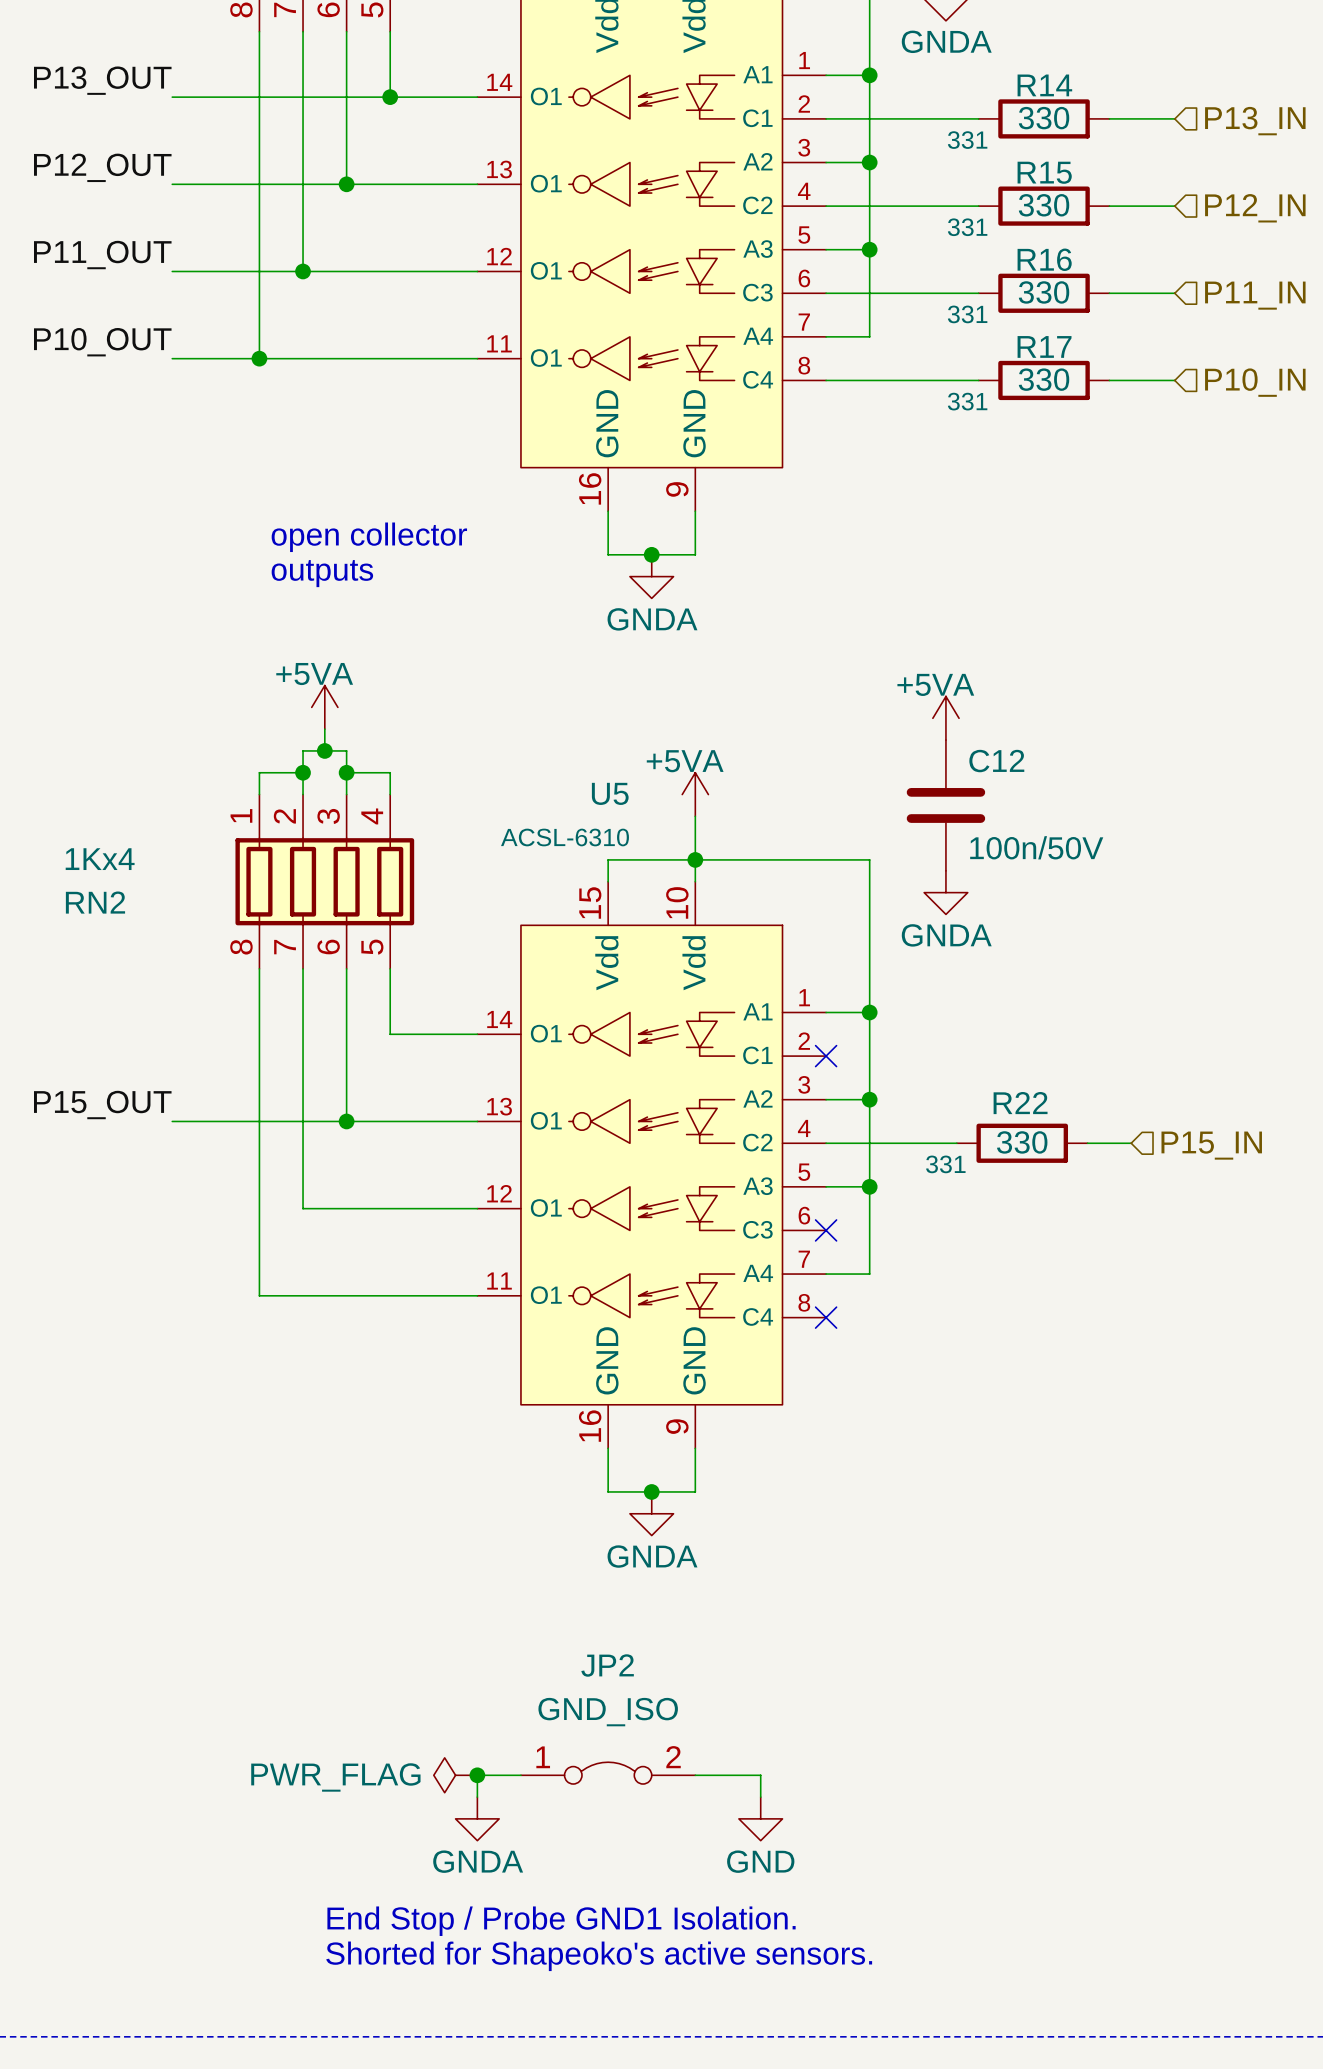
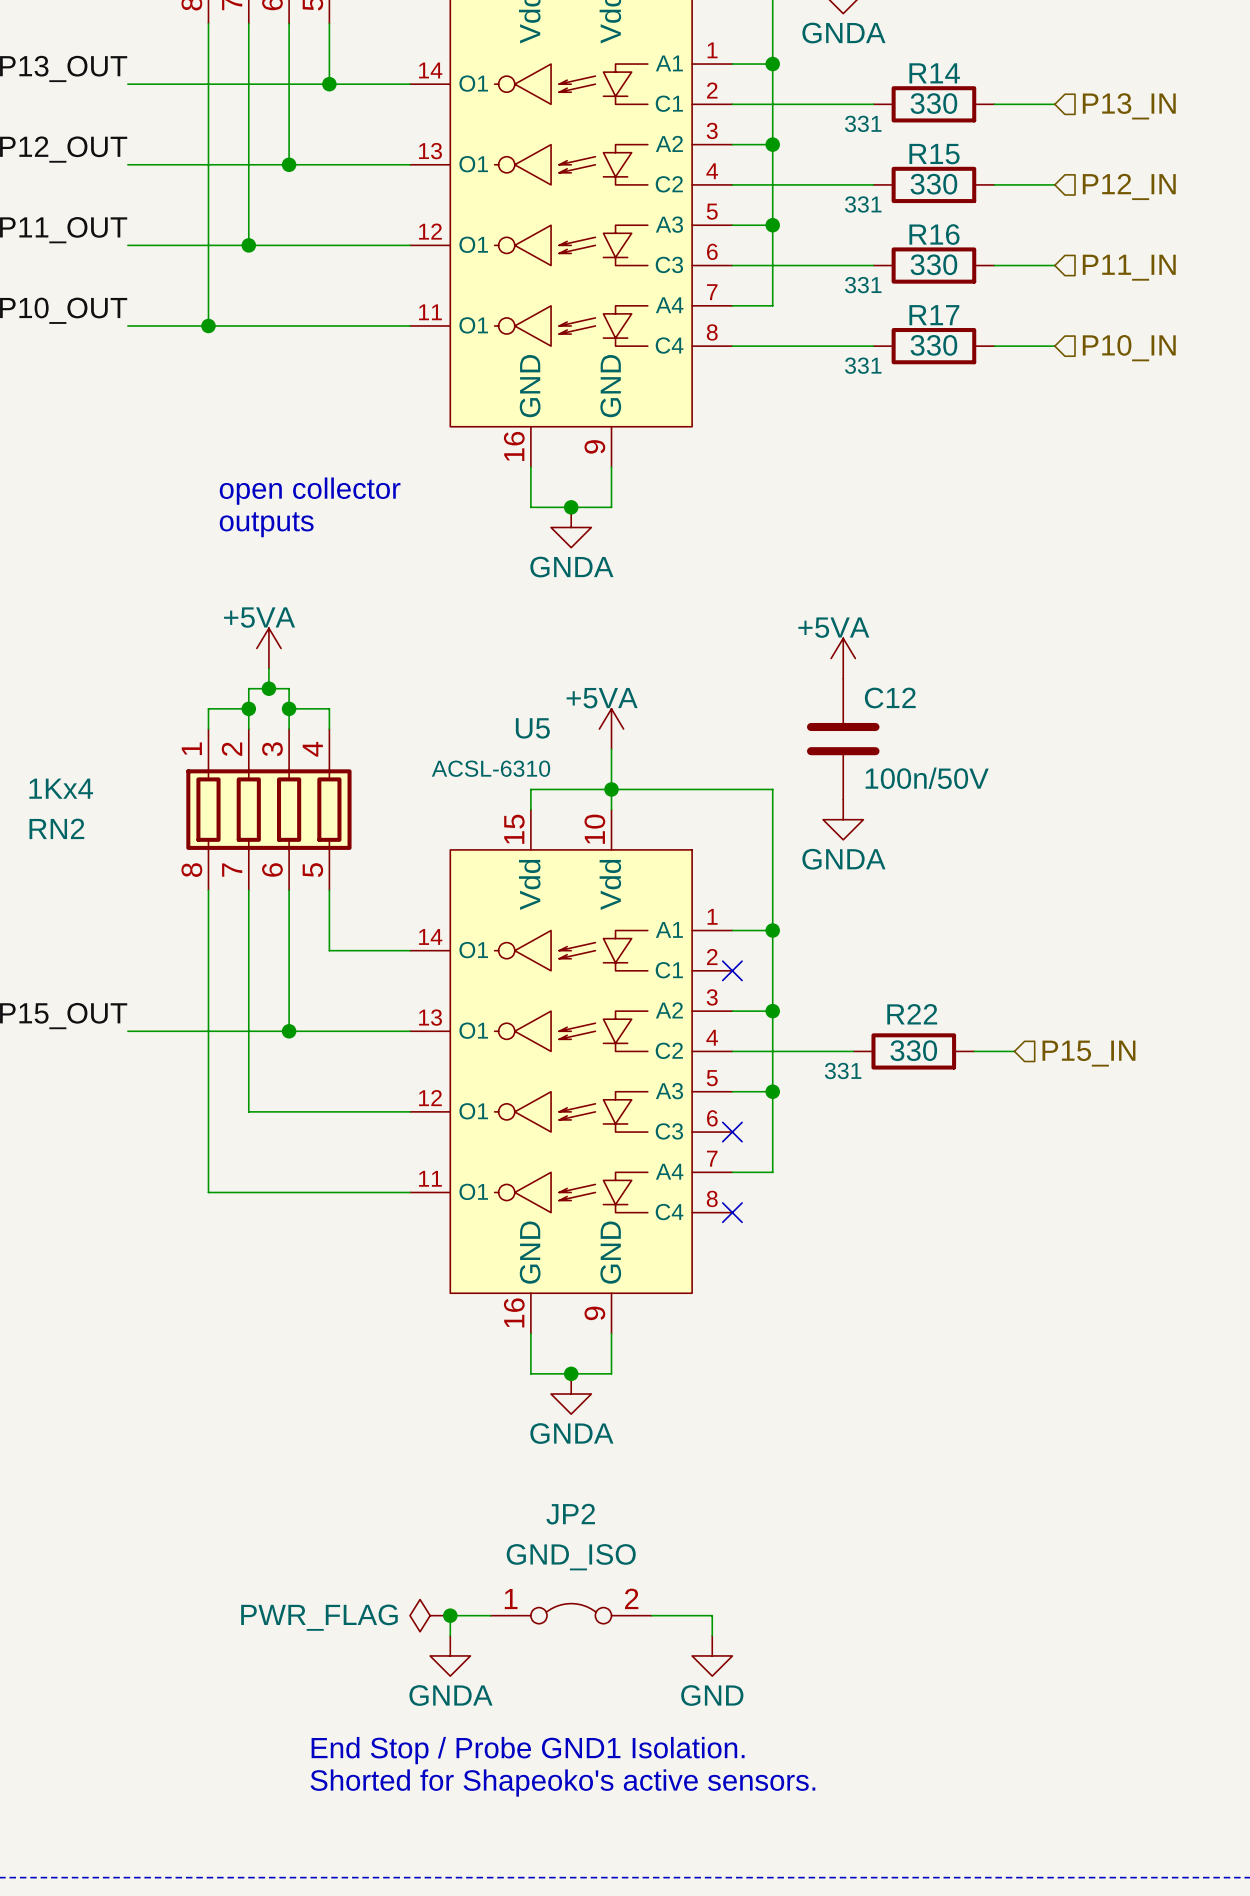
JP2 position: (608, 1773) -> (571, 1613)
power symbol position: PWR_FLAG (455, 1775) -> PWR_FLAG (430, 1615)
junction position: (477, 1775) -> (450, 1615)
wire: (520, 1775) (477, 1775) (477, 1797) -> (450, 1635) (450, 1615) (490, 1615)
wire: (695, 1775) (760, 1775) (760, 1797) -> (651, 1615) (712, 1615) (712, 1635)
power symbol position: GNDA (477, 1818) -> GNDA (450, 1655)
power symbol position: GND (760, 1818) -> GND (712, 1655)
text position: End Stop / Probe GND1 Isolation. (561, 1921) -> End Stop / Probe GND1 Isolation. (528, 1750)
text position: Shorted for Shapeoko's active sensors. (599, 1956) -> Shorted for Shapeoko's active sensors. (562, 1783)

